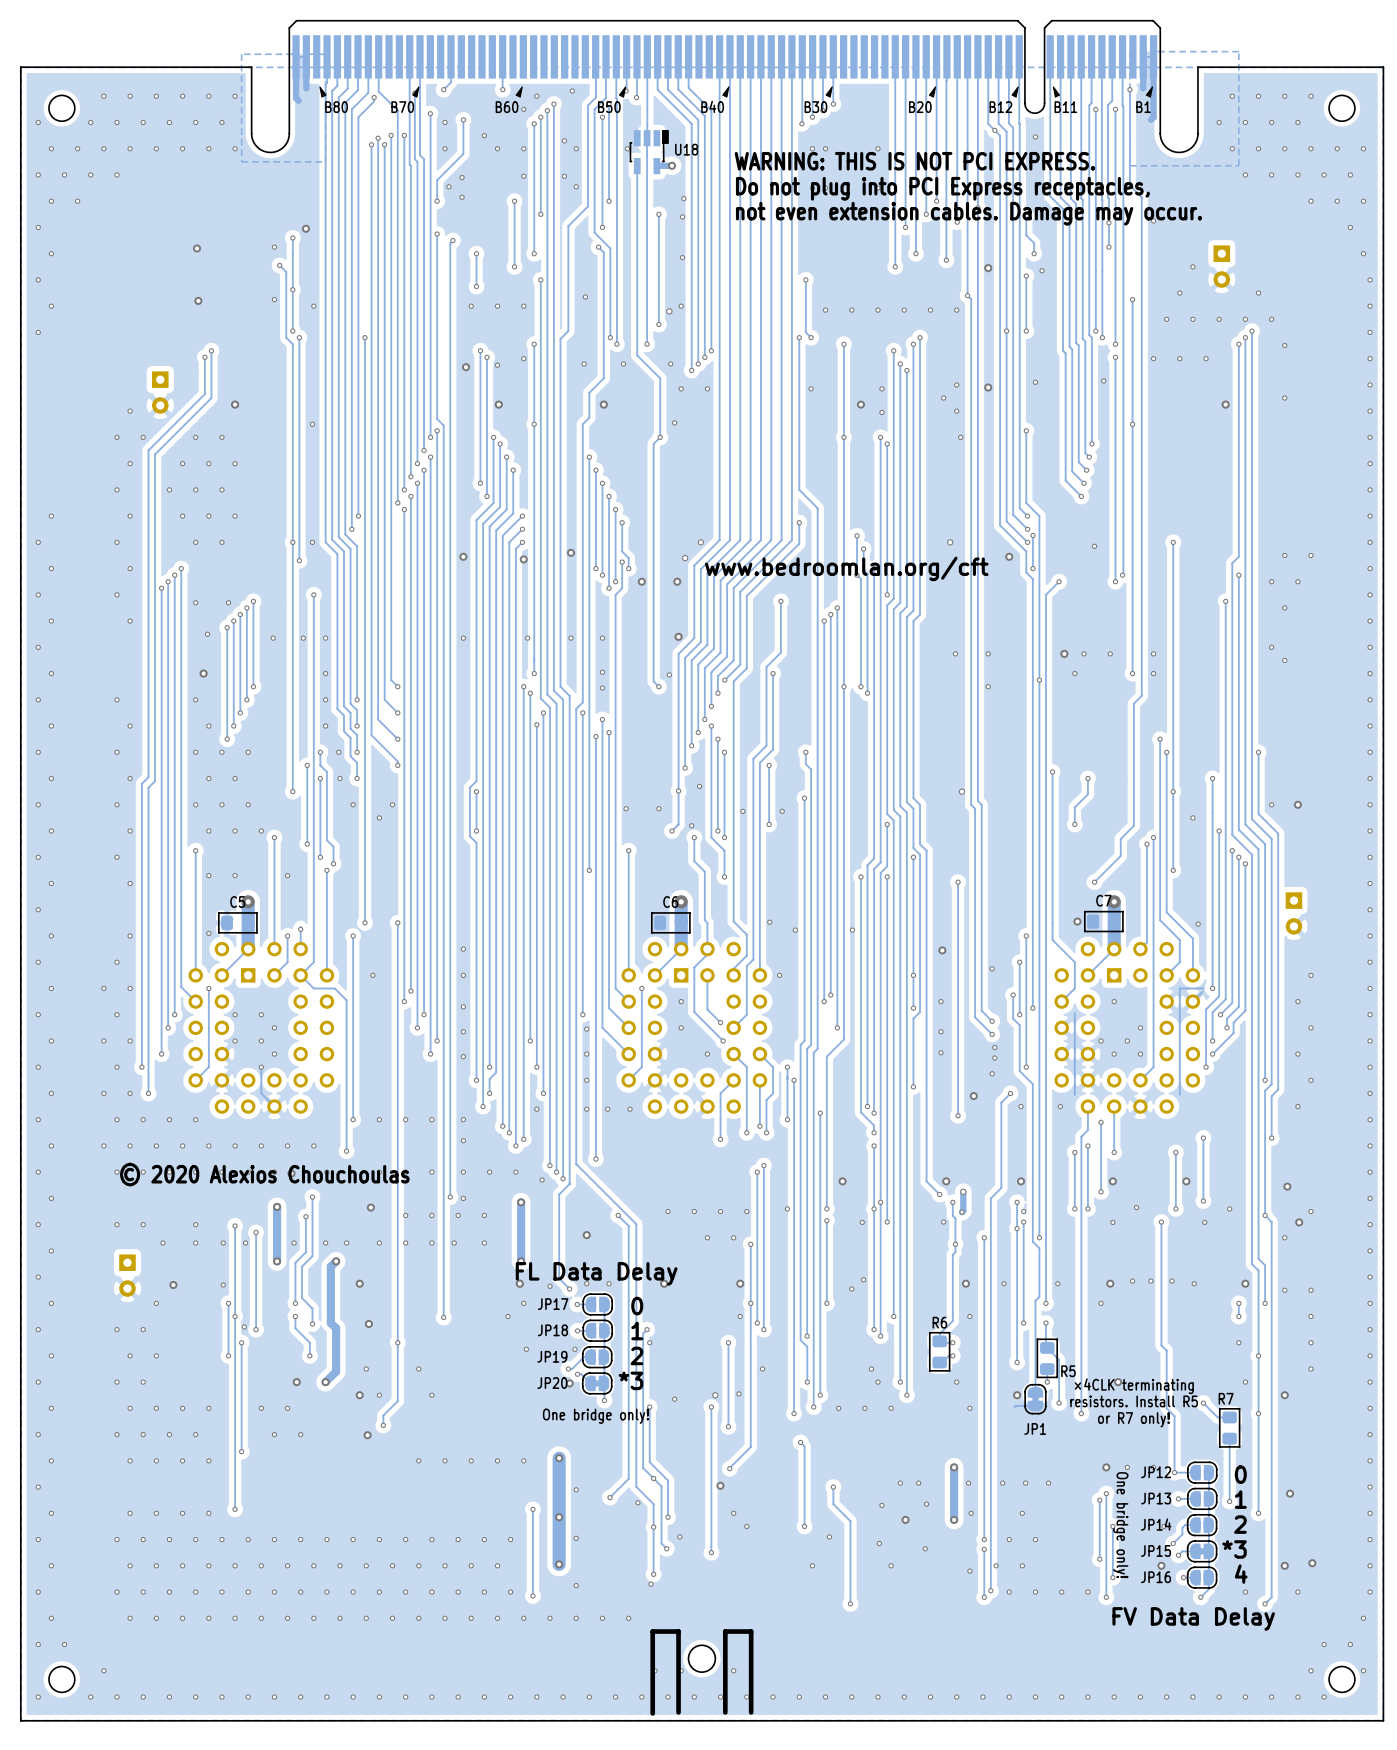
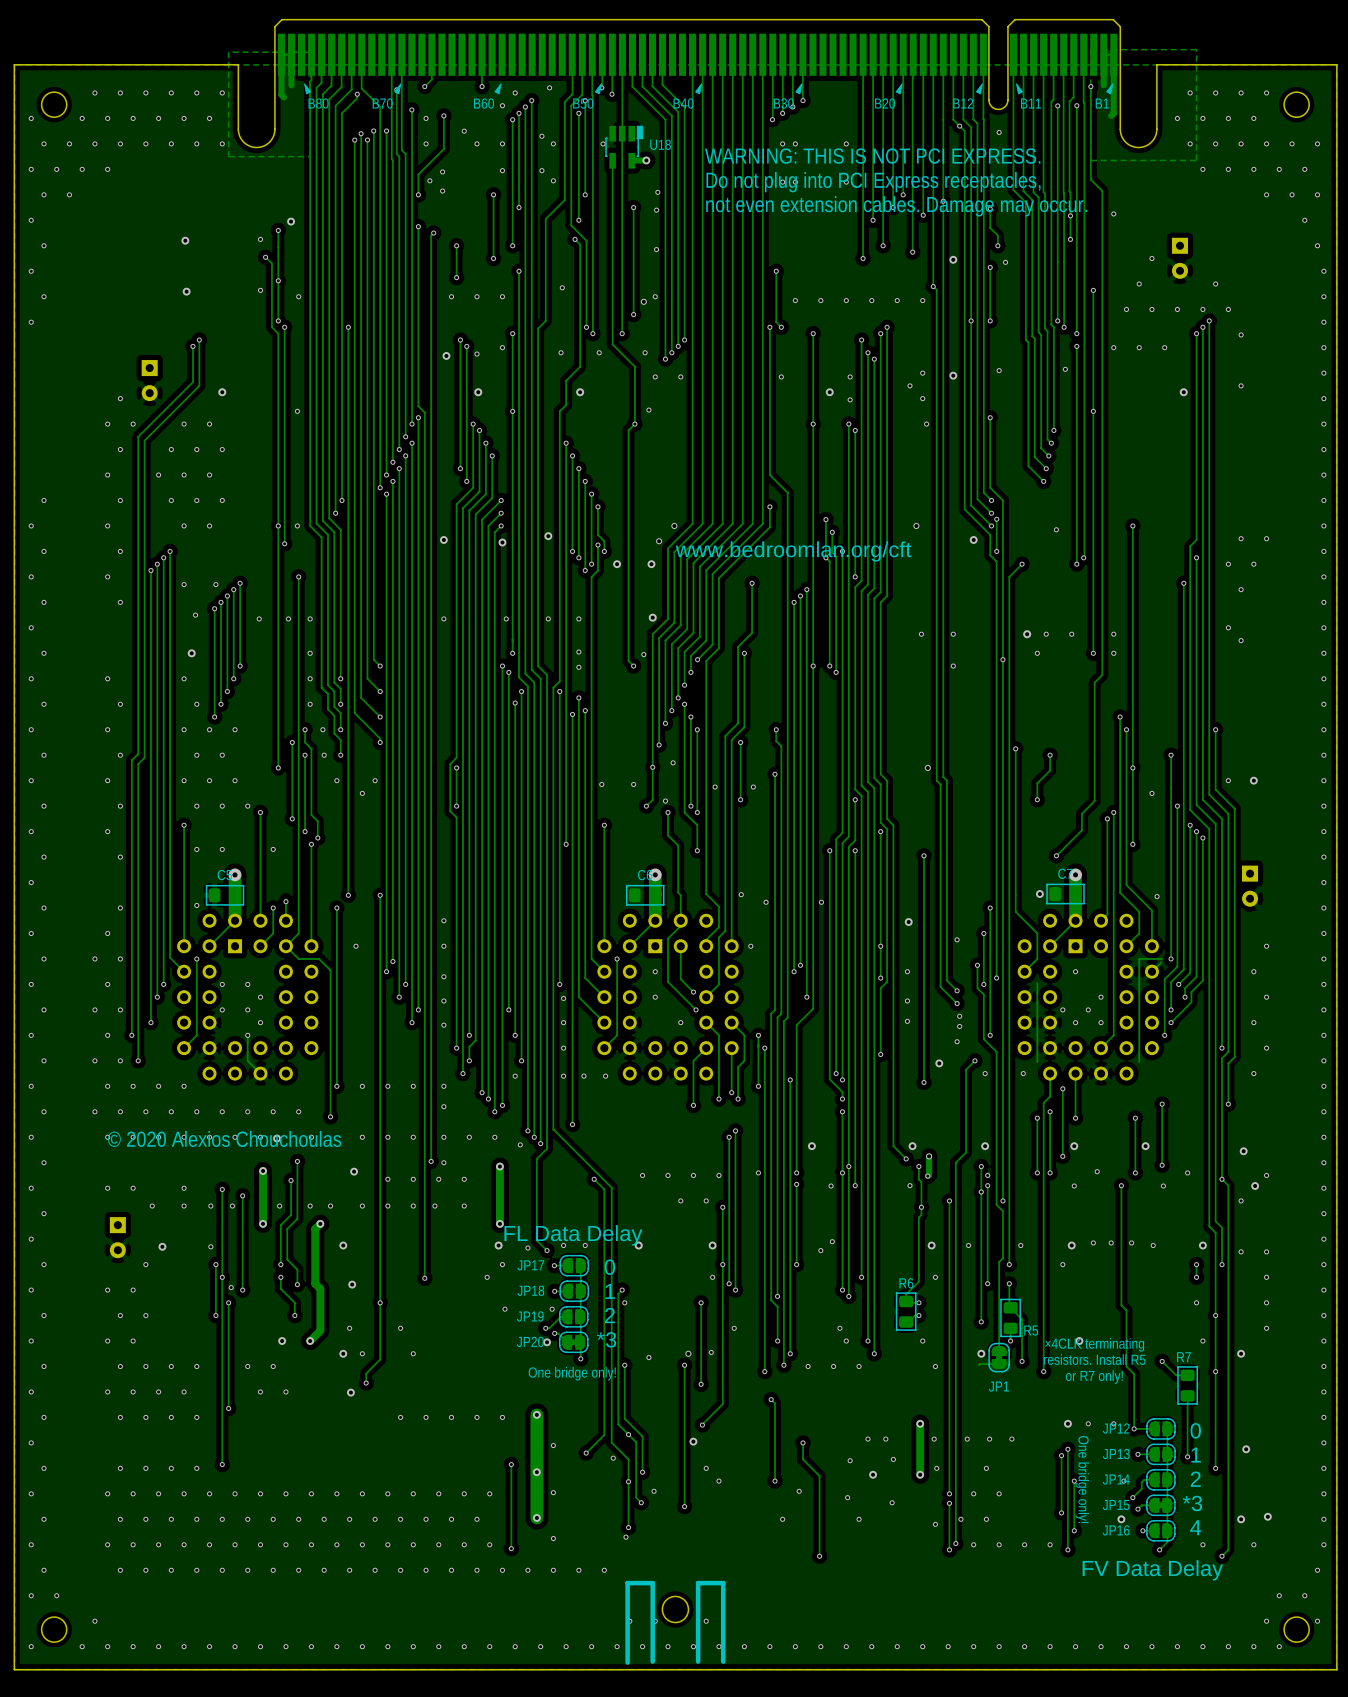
via: (586, 1235) -> none

